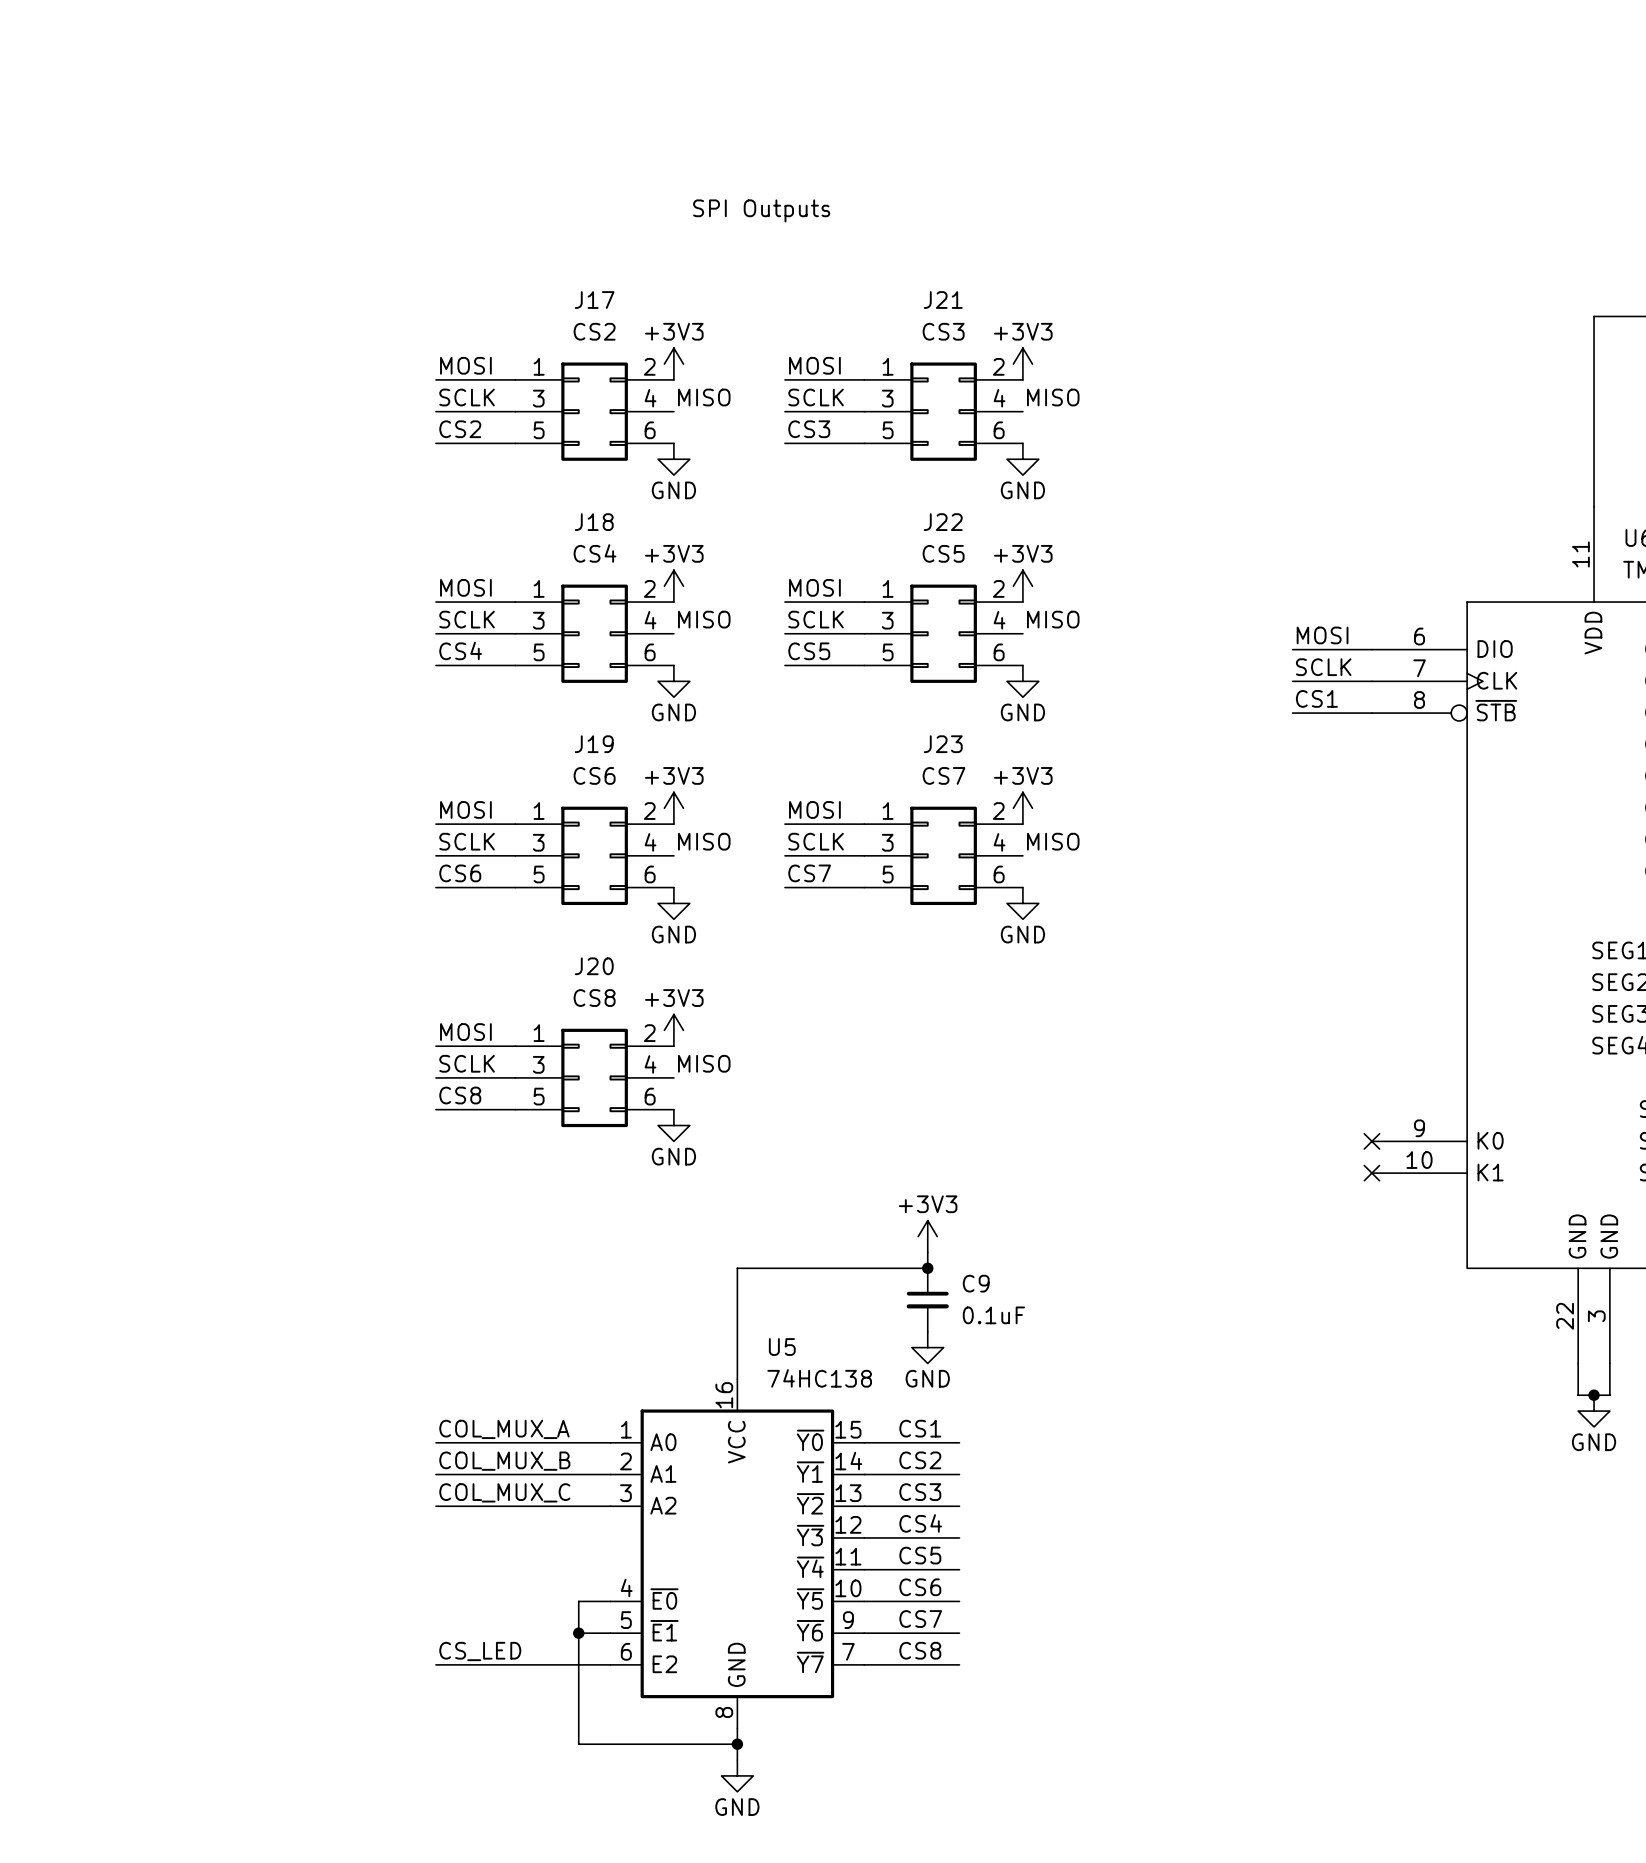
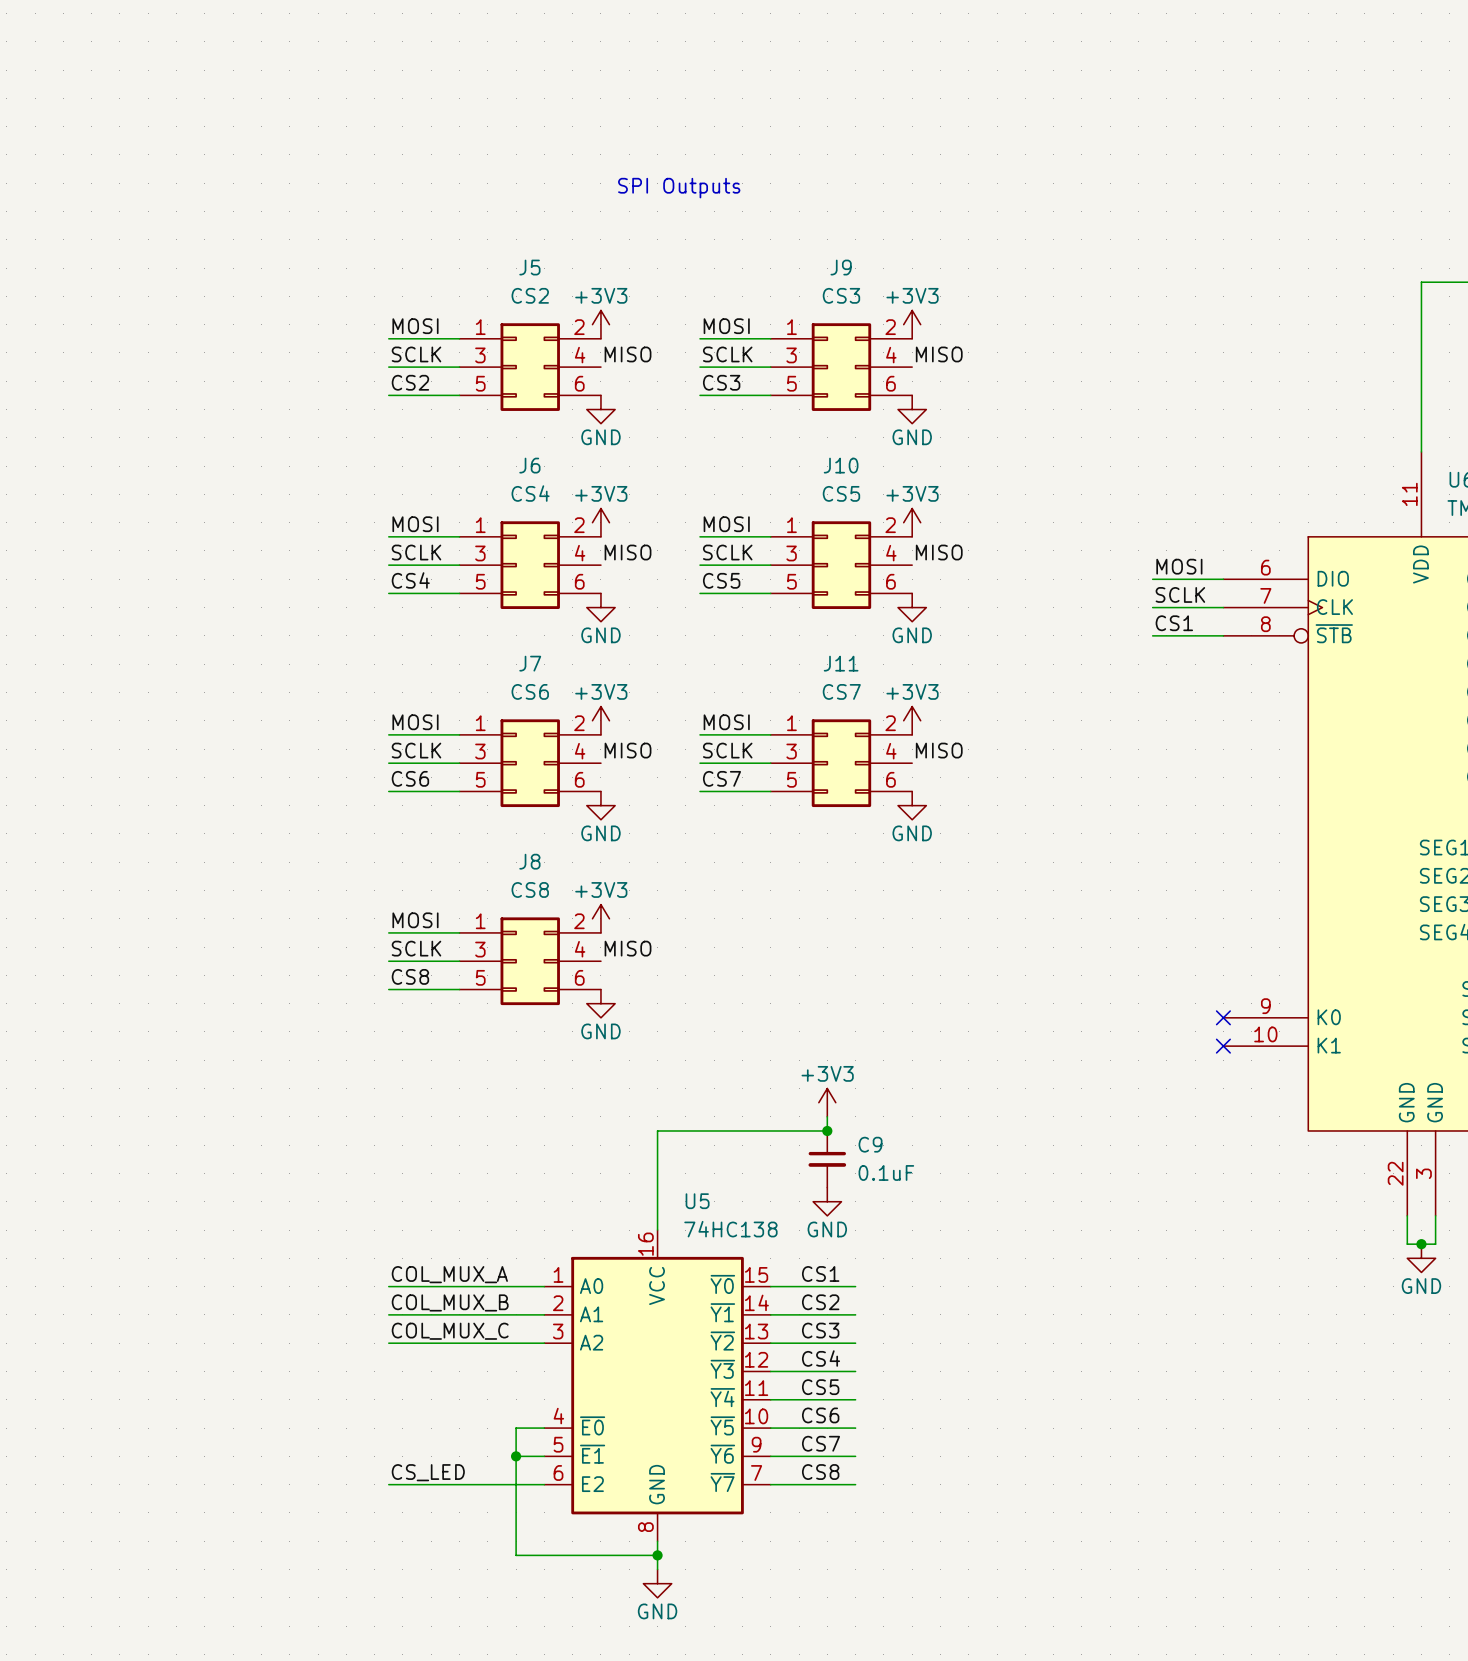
J17 name: J17 (594, 300) -> J5 (529, 267)
J21 name: J21 (943, 300) -> J9 (841, 267)
J18 name: J18 (594, 522) -> J6 (529, 465)
J22 name: J22 (943, 522) -> J10 (841, 465)
J19 name: J19 (594, 744) -> J7 (530, 663)
J23 name: J23 (943, 744) -> J11 (841, 663)
J20 name: J20 (594, 966) -> J8 (529, 861)

